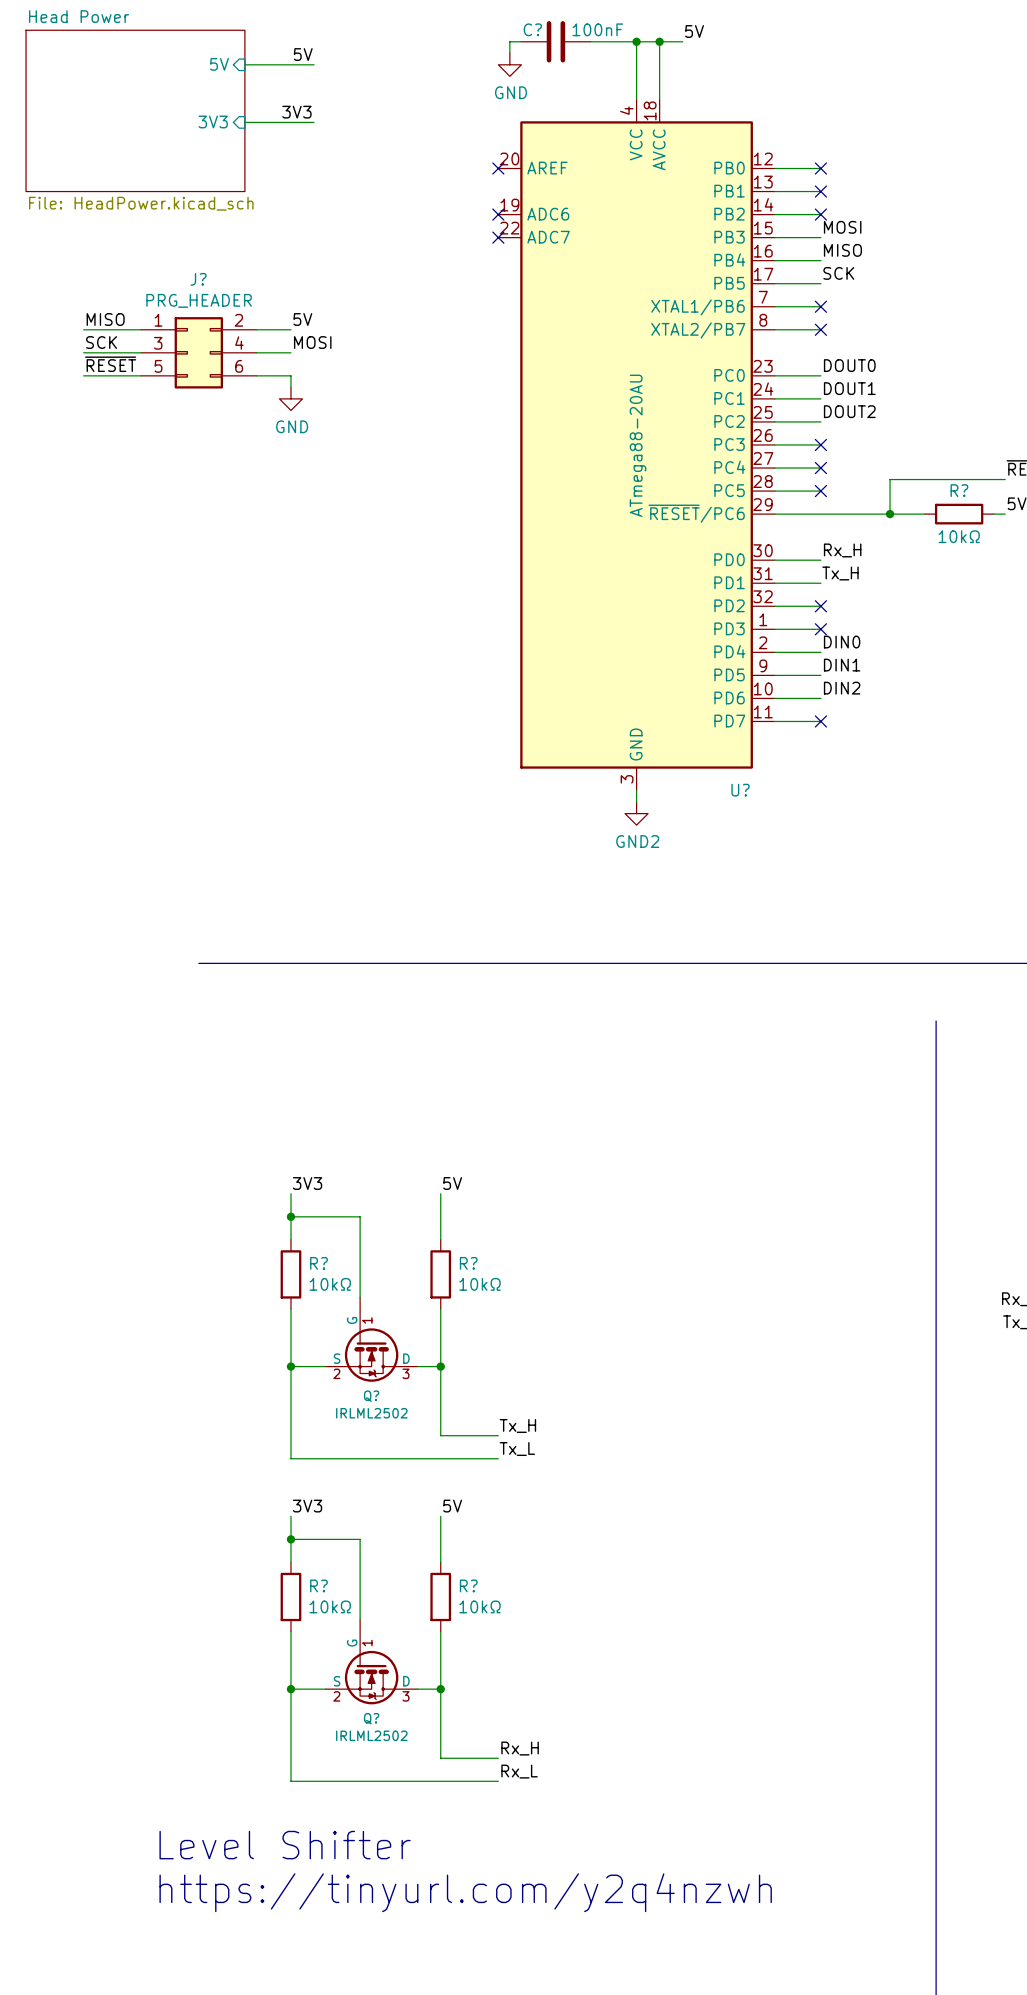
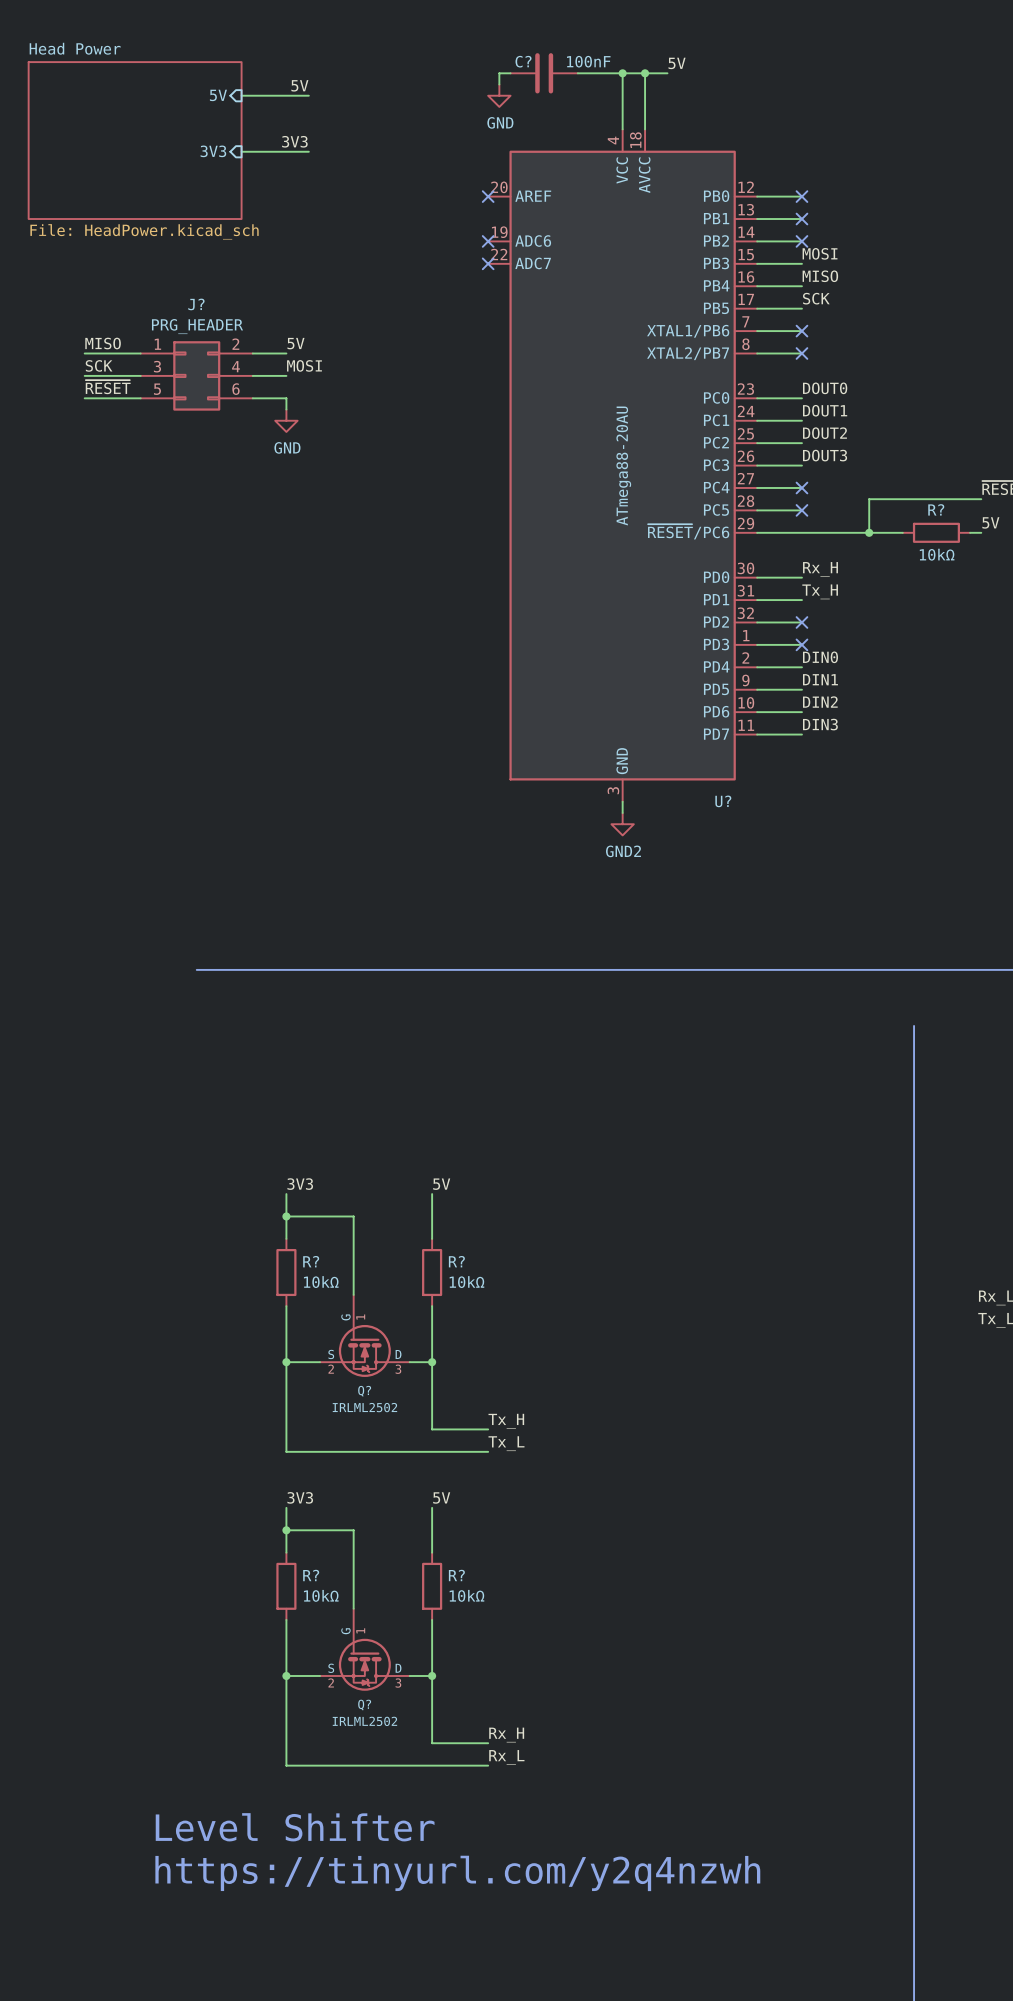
label: none -> DOUT3 (825, 455)
no-connect mark: (820, 444) -> none
label: none -> DIN3 (820, 724)
no-connect mark: (820, 721) -> none

